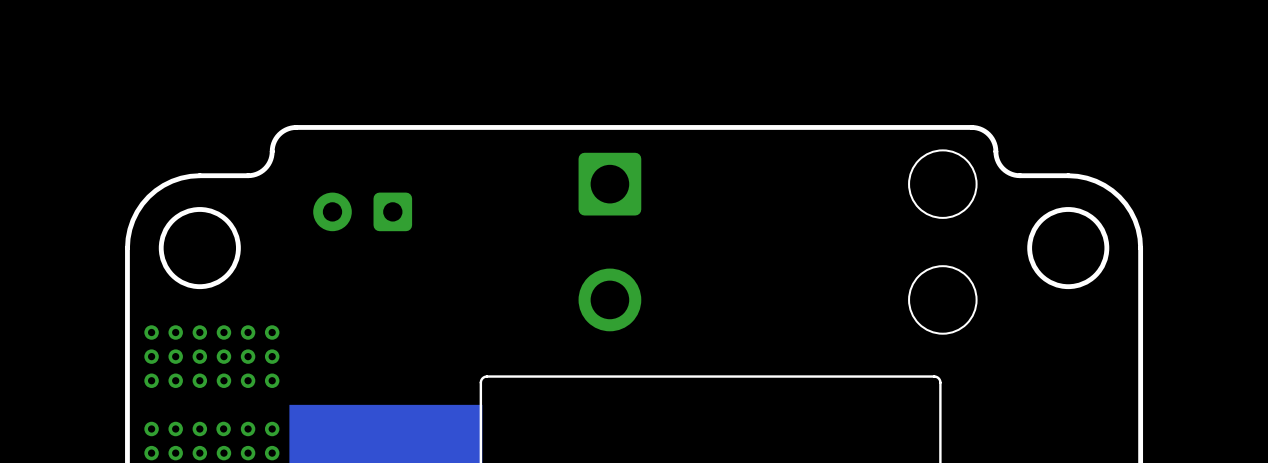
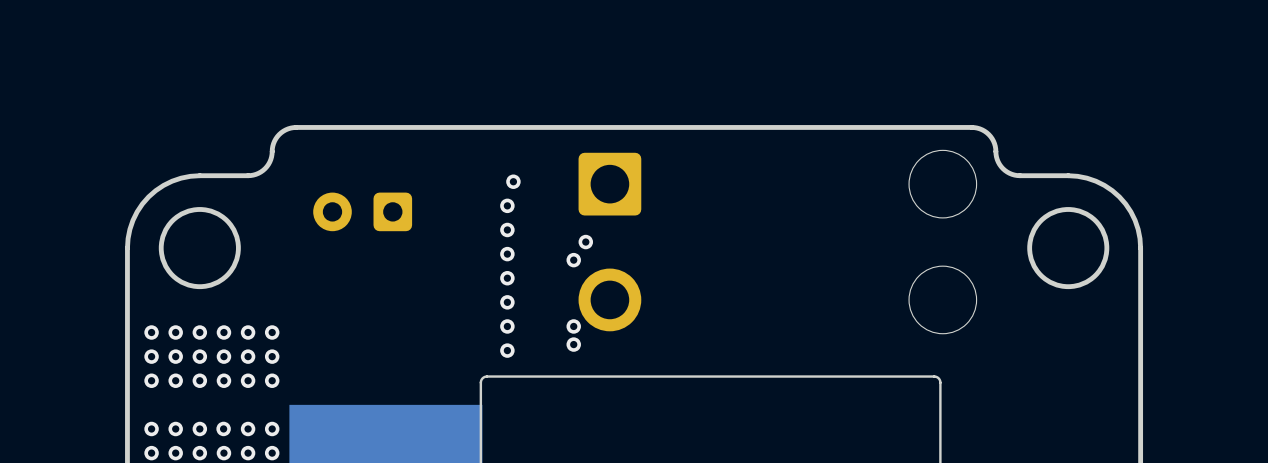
via: none -> (513, 181)
via: none -> (507, 205)
via: none -> (507, 229)
via: none -> (585, 242)
via: none -> (507, 254)
via: none -> (573, 260)
via: none -> (507, 278)
via: none -> (507, 302)
via: none -> (507, 326)
via: none -> (573, 326)
via: none -> (573, 344)
via: none -> (507, 350)

